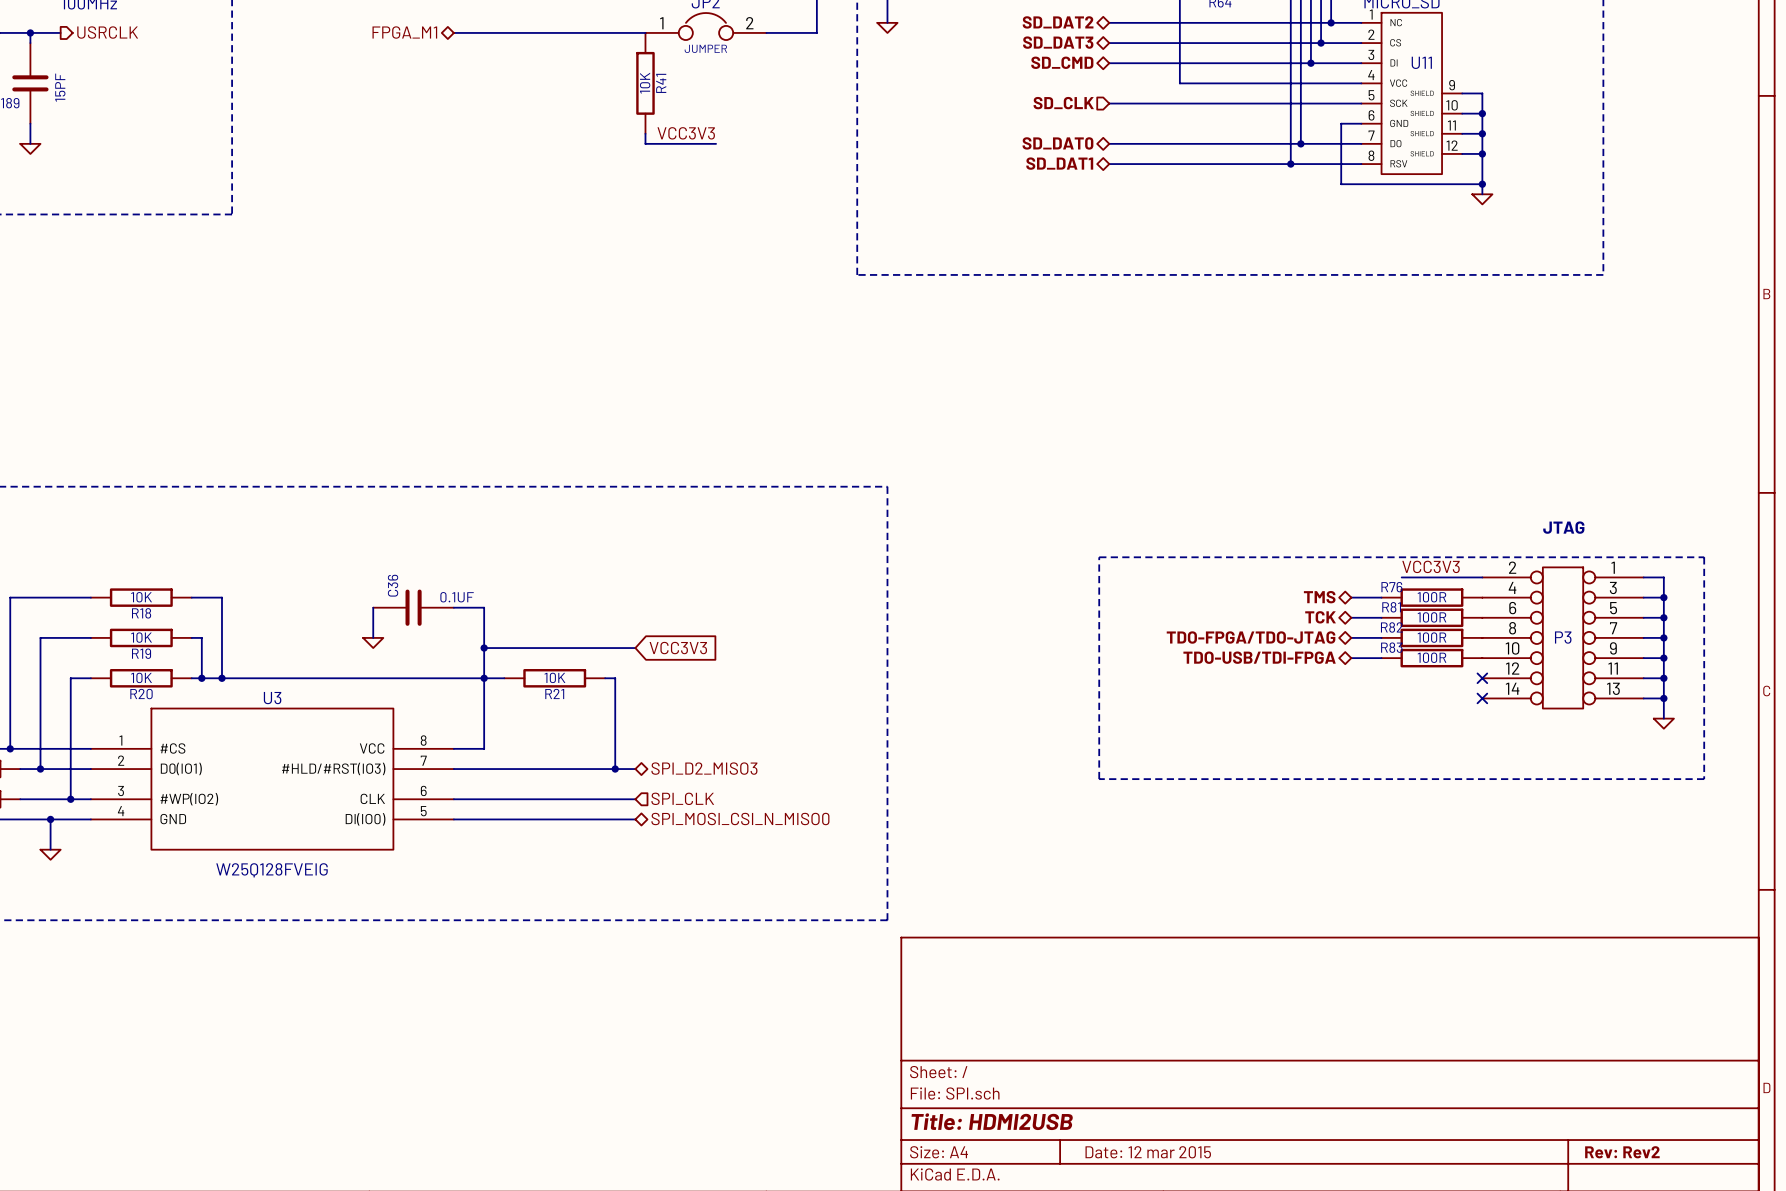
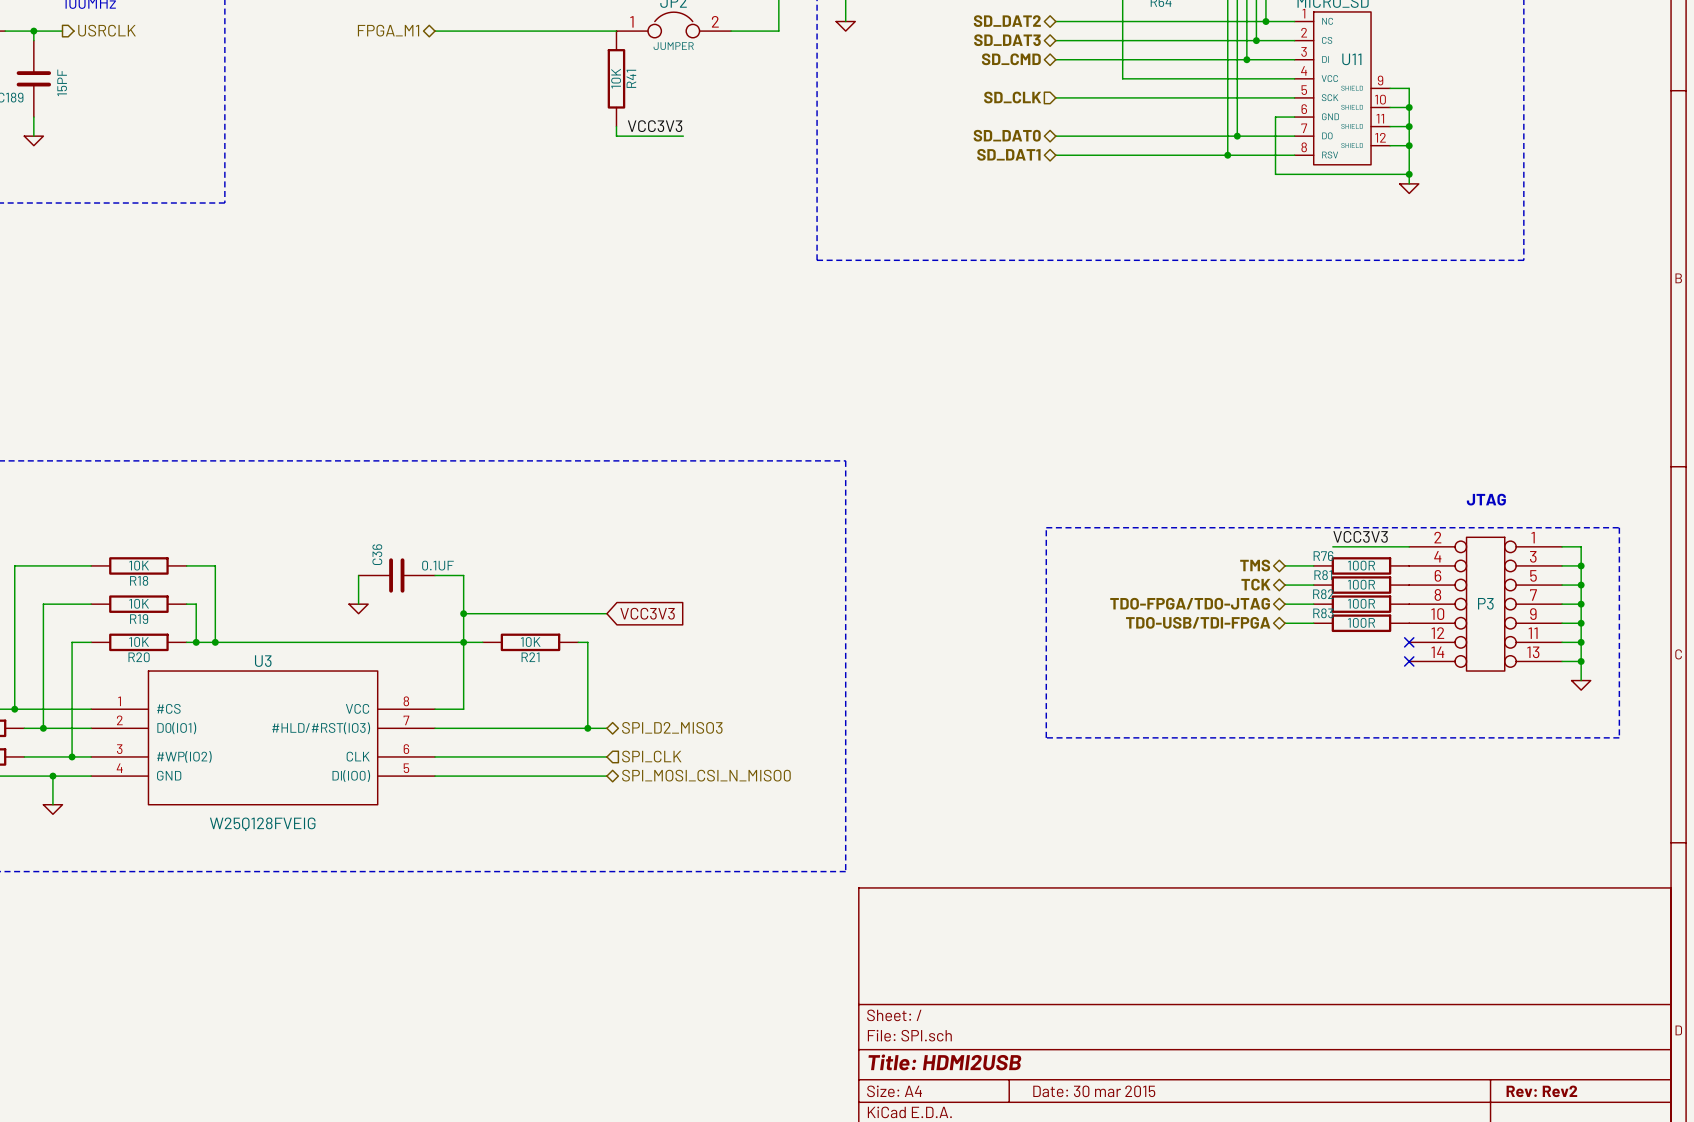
title block: Date: 12 mar 2015 (1148, 1152) -> Date: 30 mar 2015 (1094, 1091)

